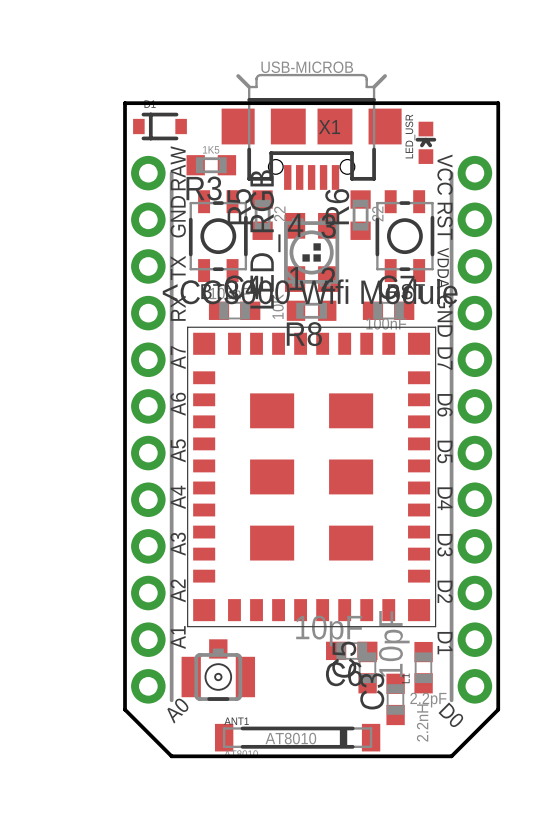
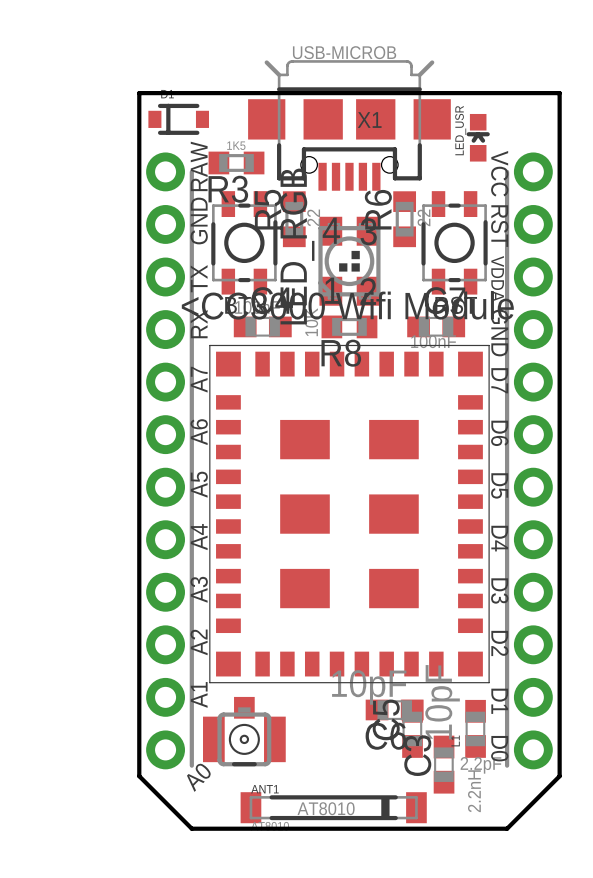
text rotation: 0° (451, 714) -> 45° clockwise (499, 748)

